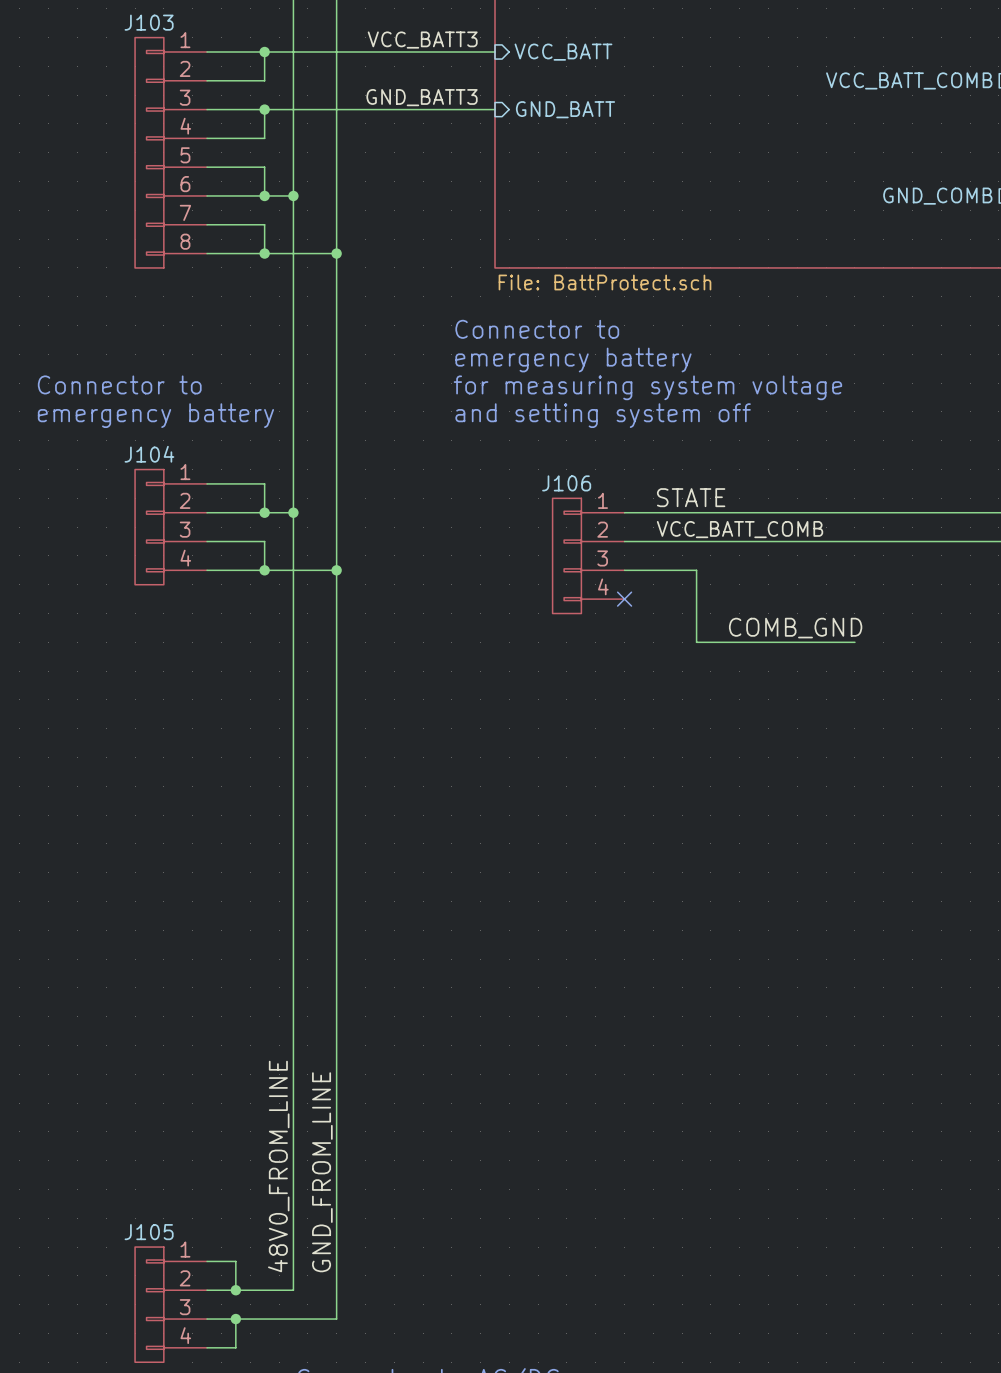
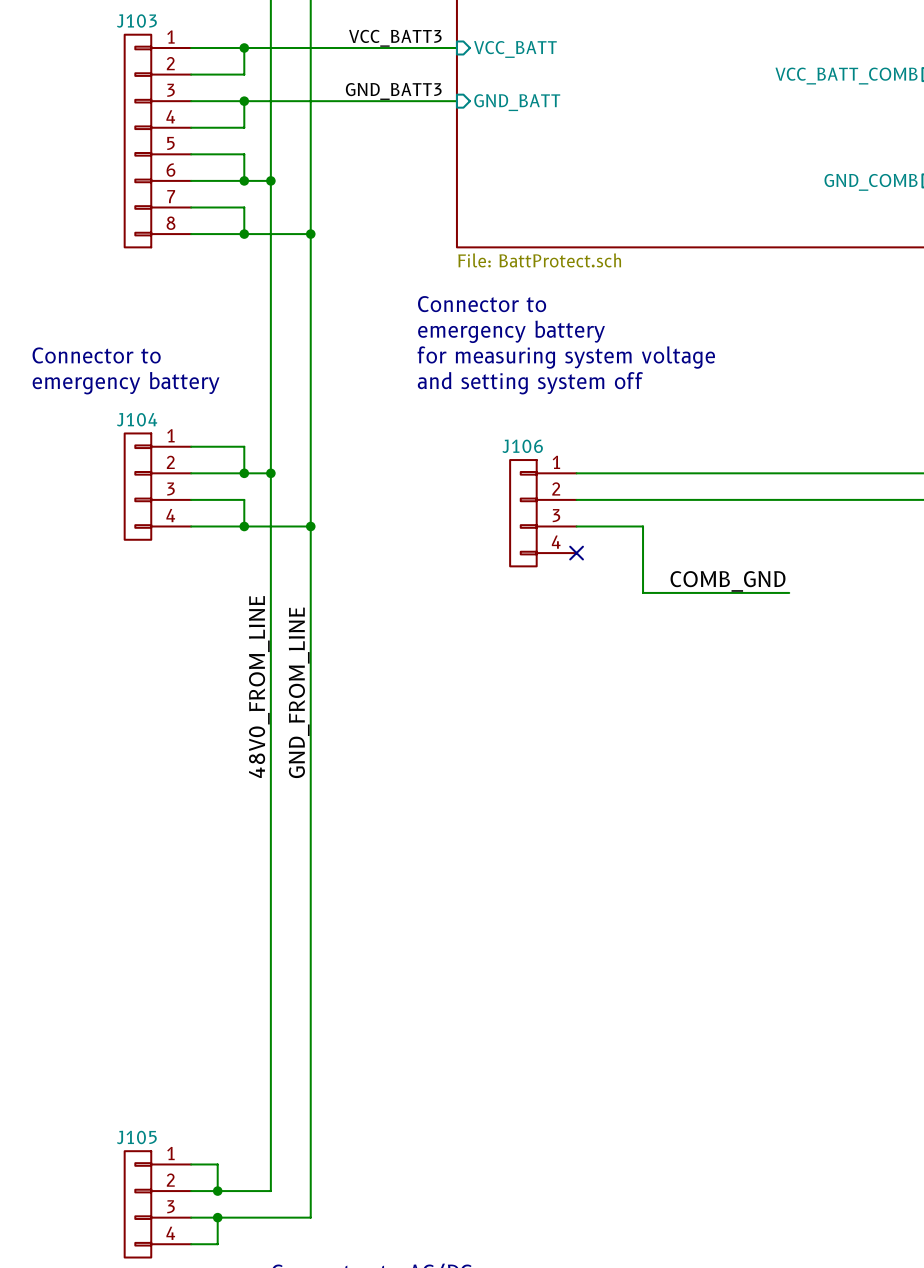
label: STATE (691, 497) -> none
label: VCC_BATT_COMB (740, 529) -> none
label: none -> 48V0_FROM_LINE (259, 686)
label: none -> GND_FROM_LINE (299, 692)
label: 48V0_FROM_LINE (278, 1166) -> none
label: GND_FROM_LINE (322, 1172) -> none

